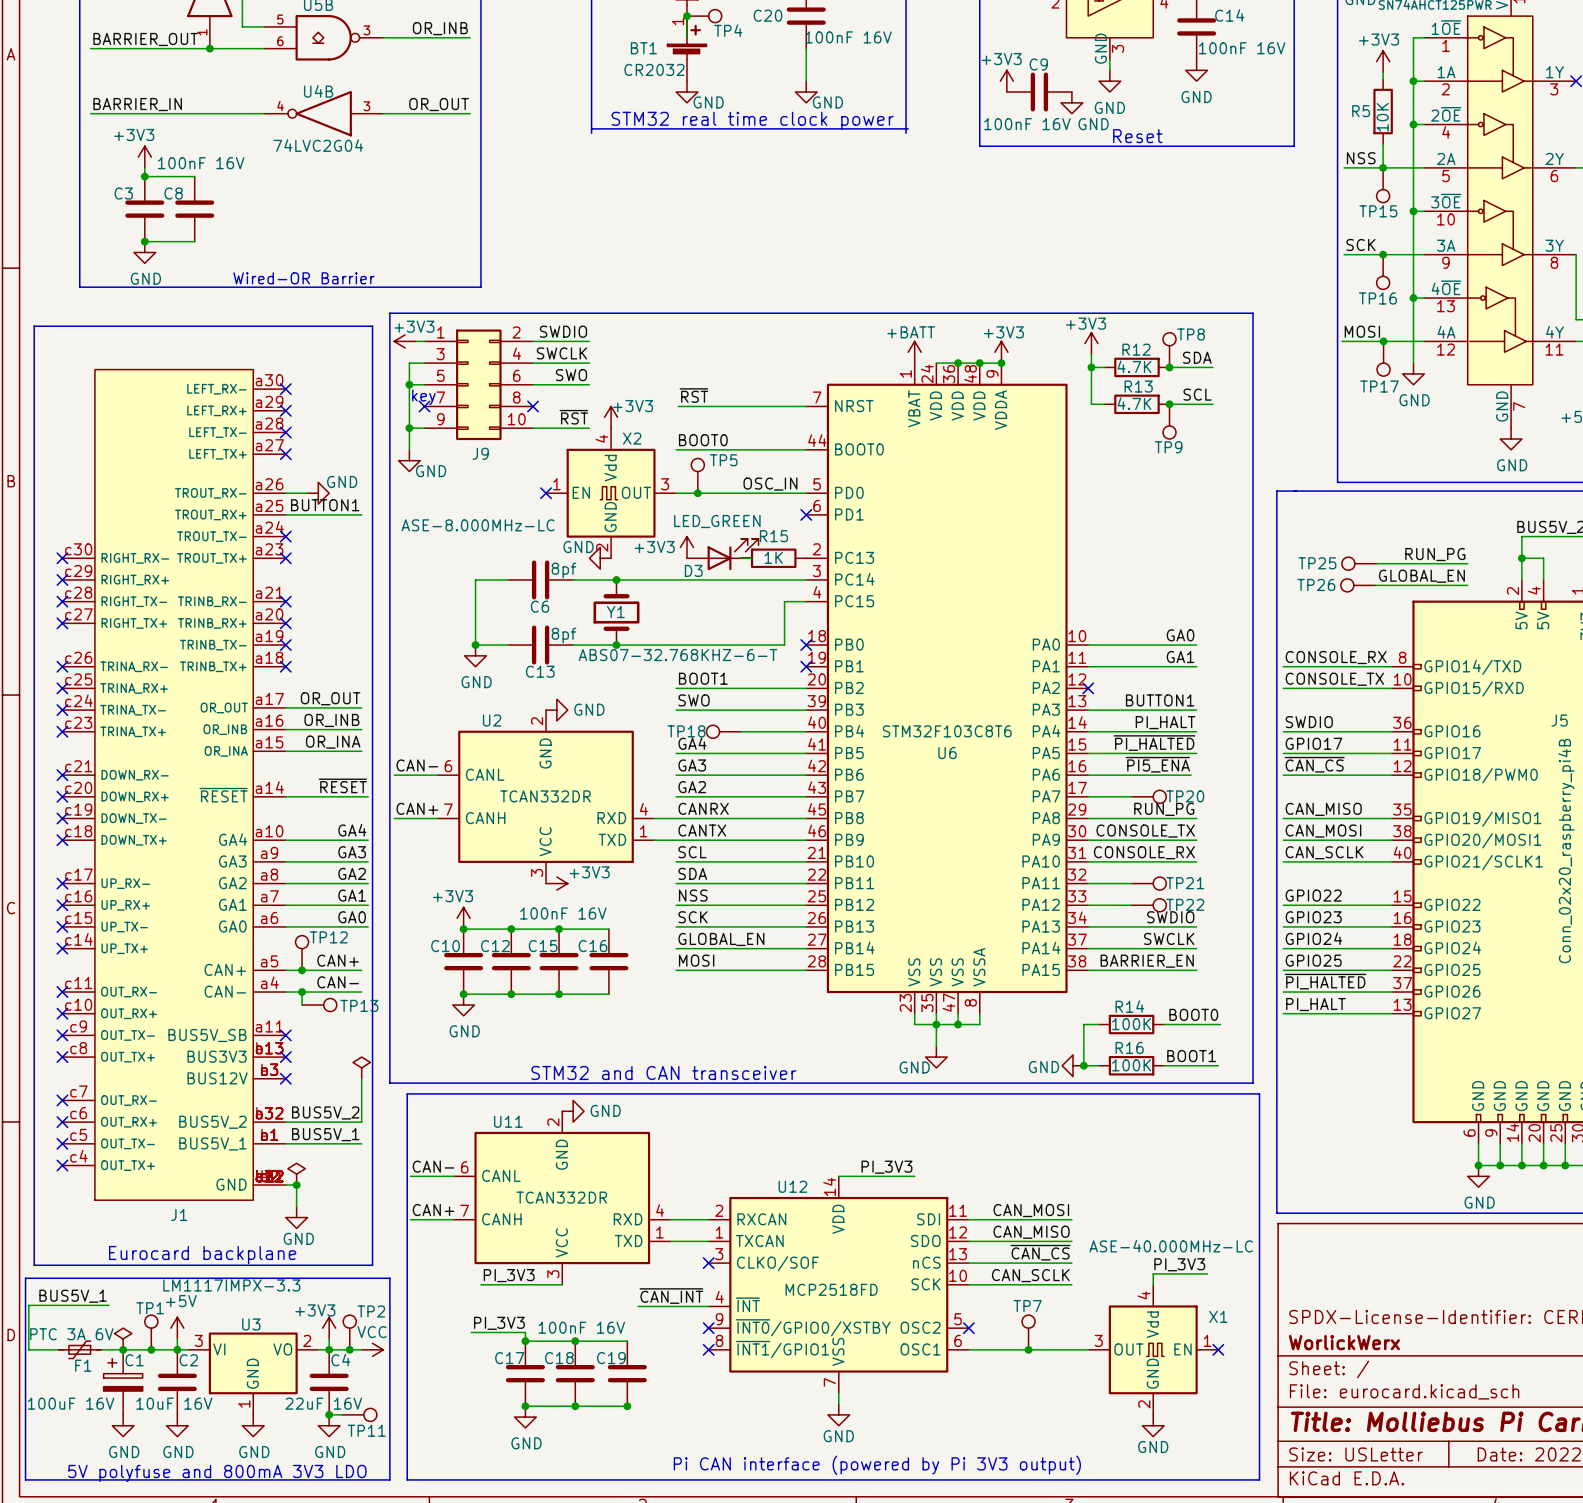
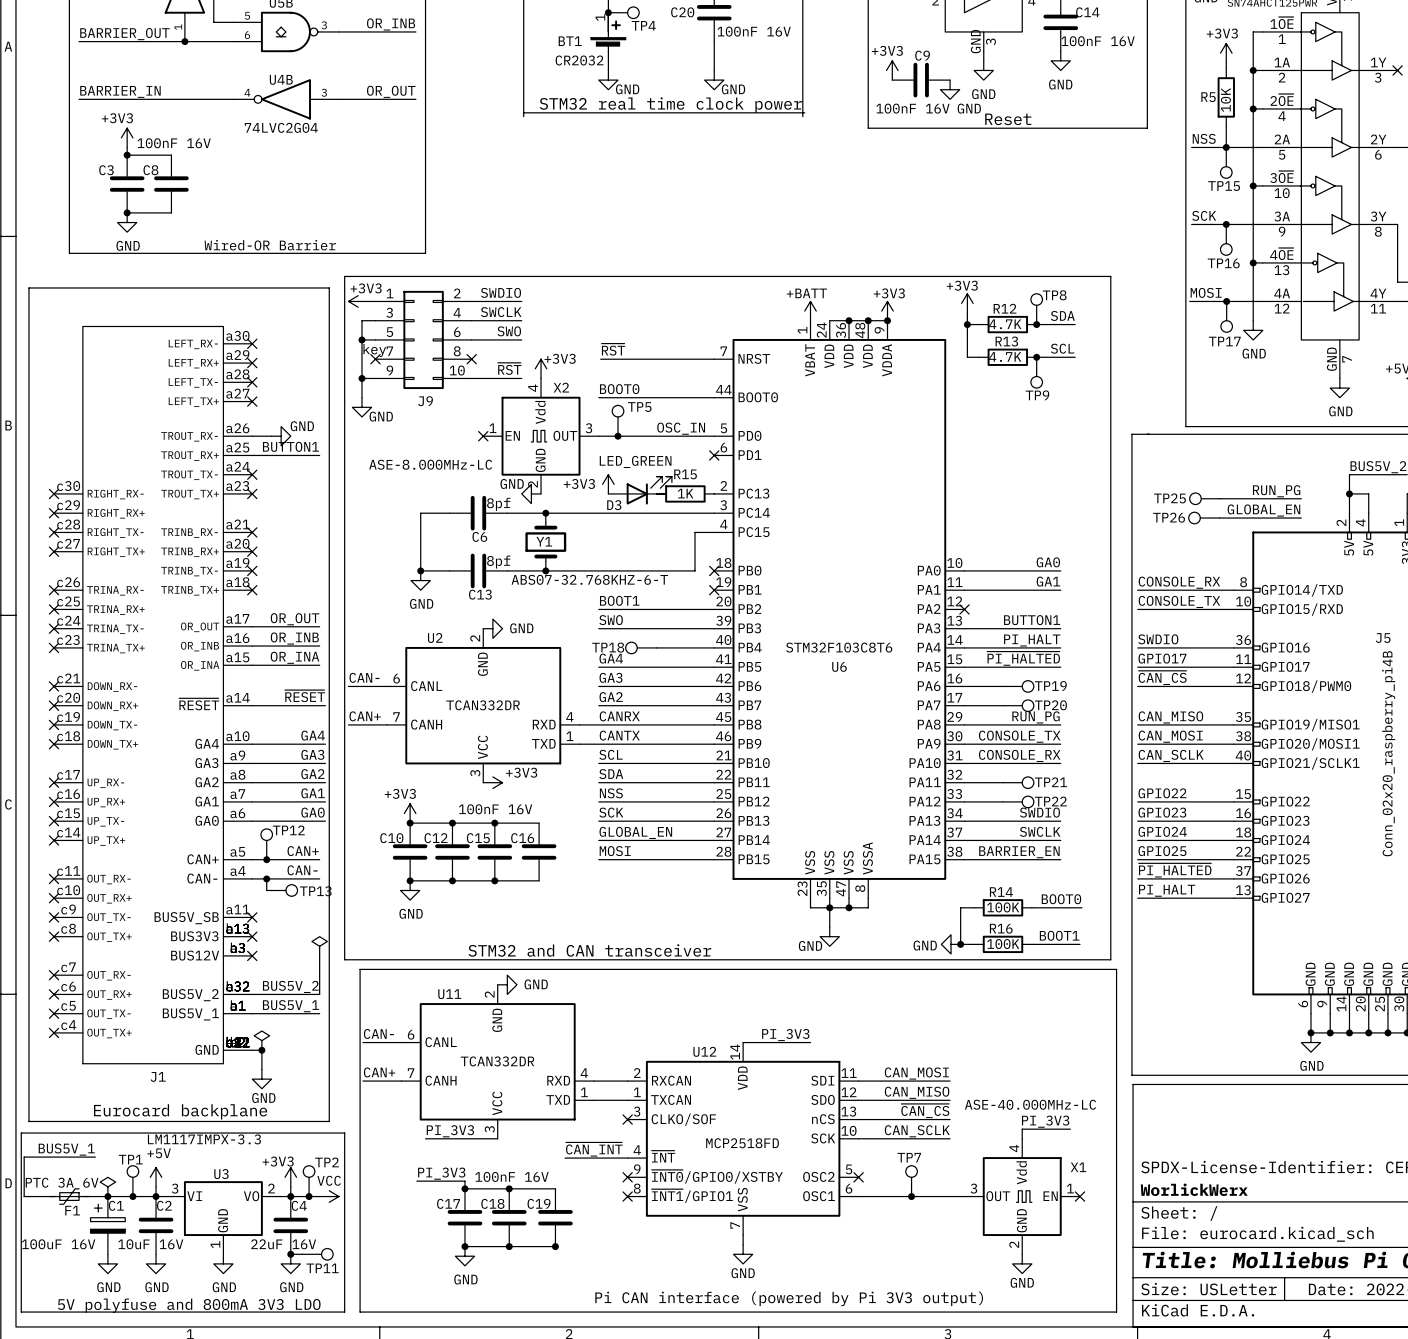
label: ~{PI5_ENA} (1157, 764) -> none
TP19: none -> (1018, 686)

